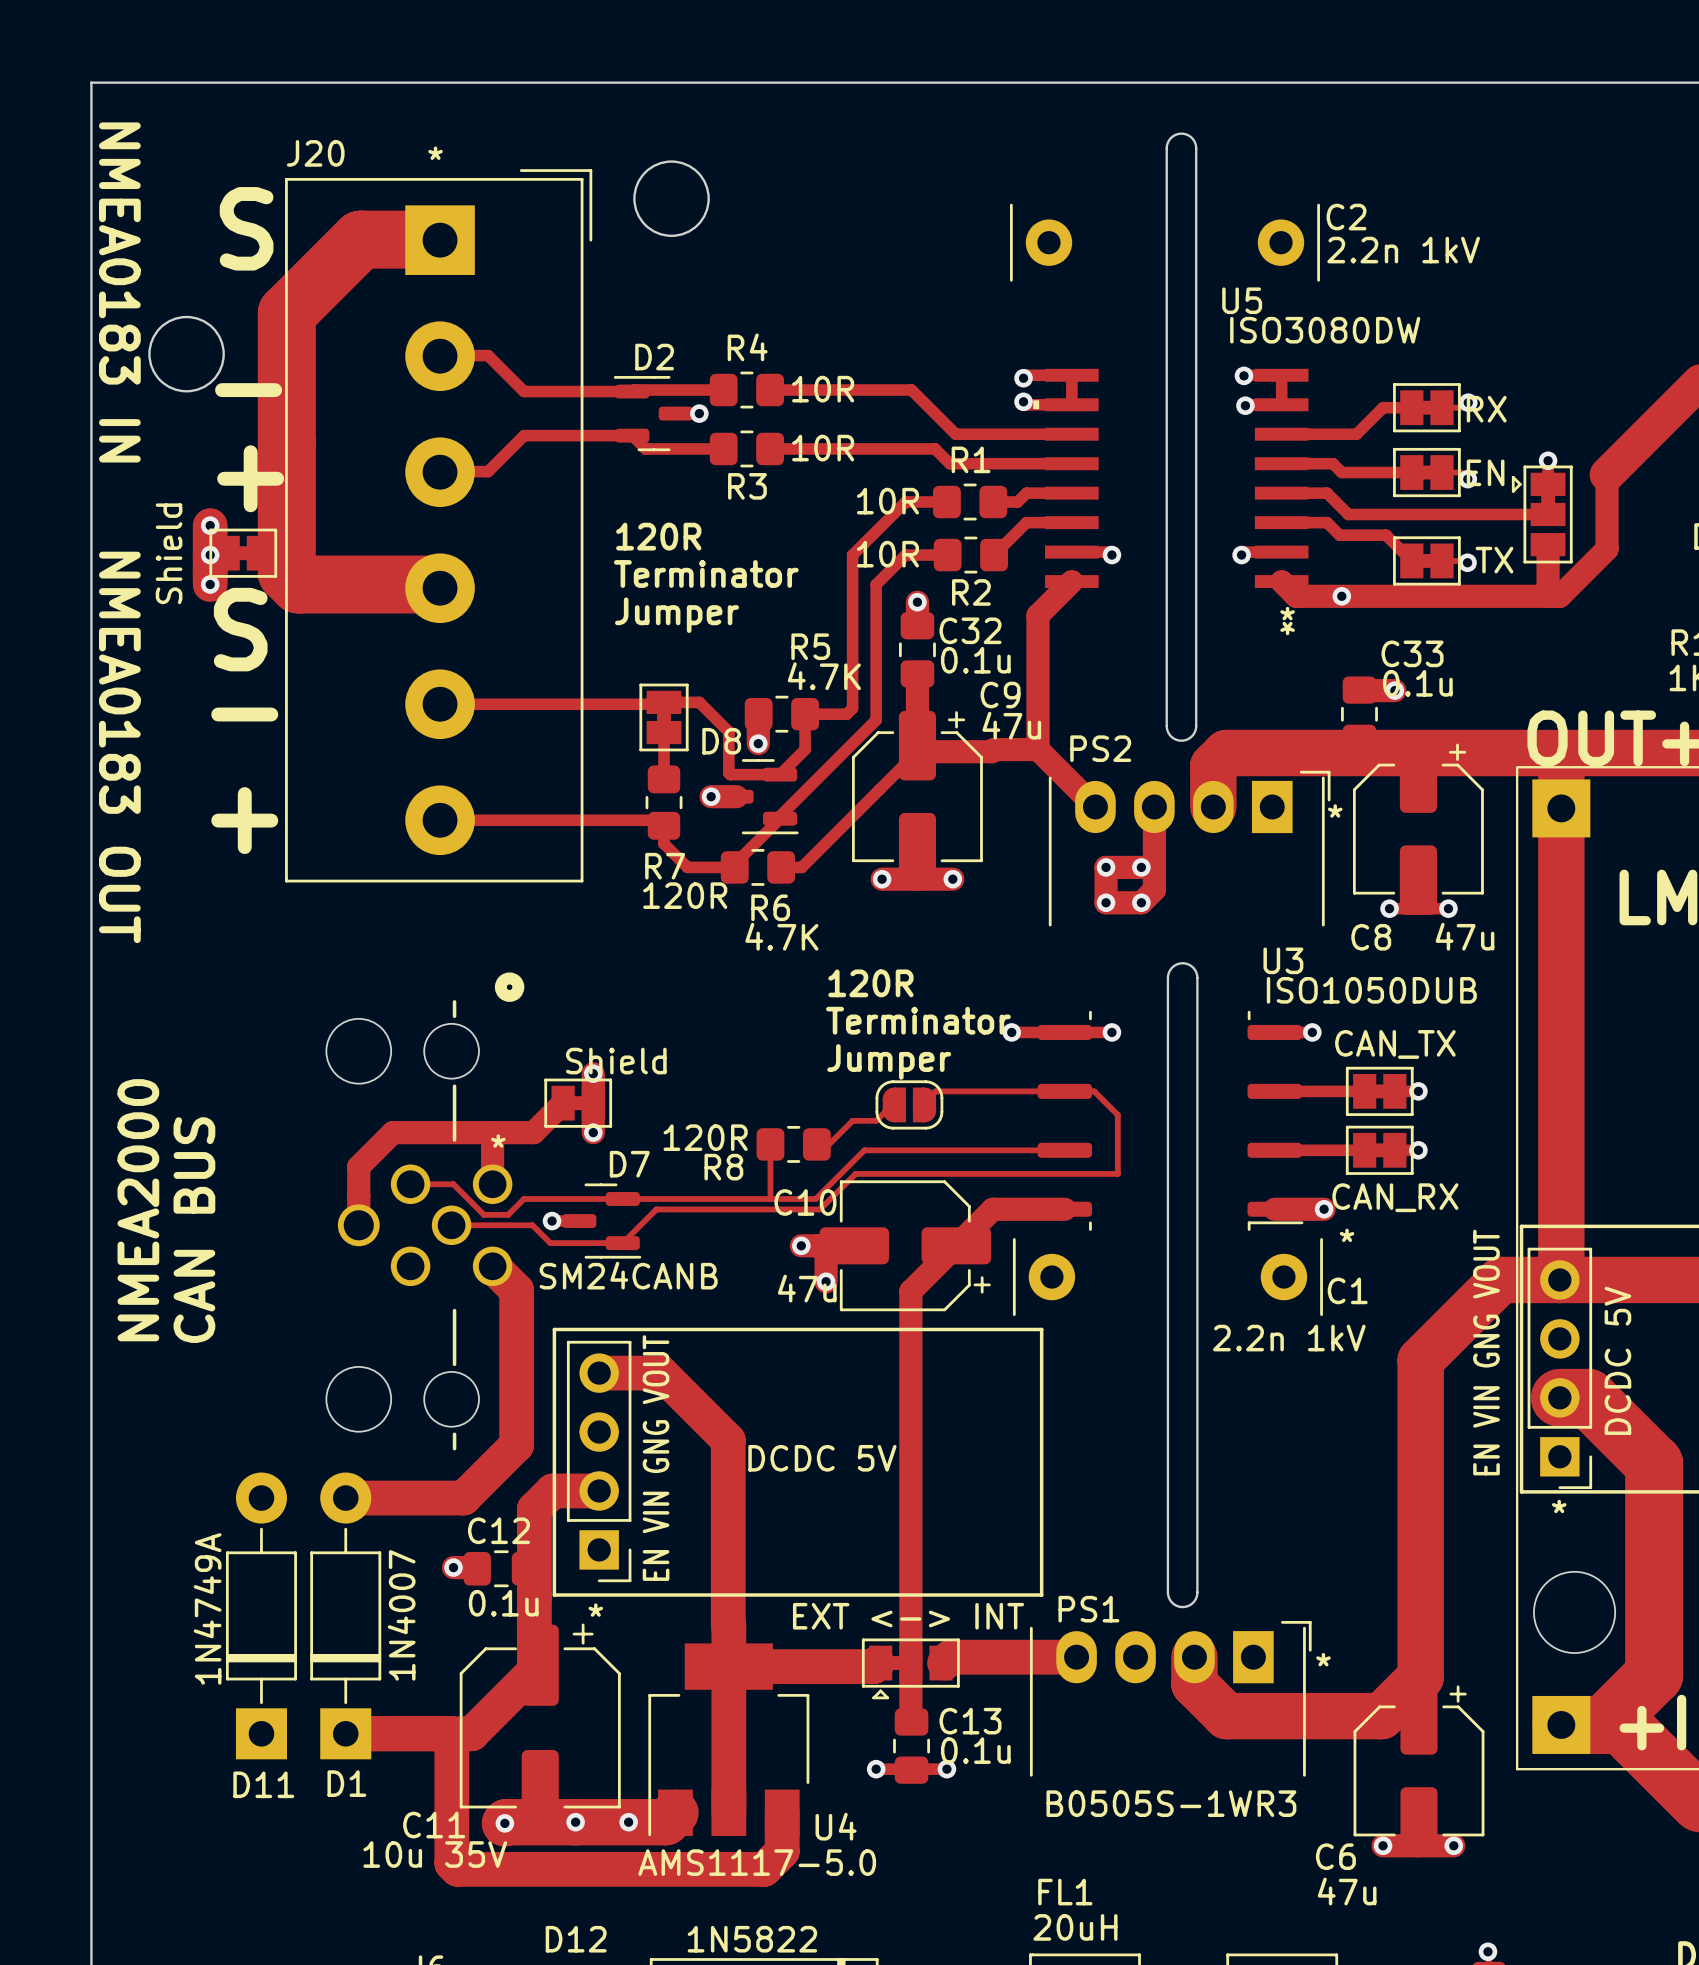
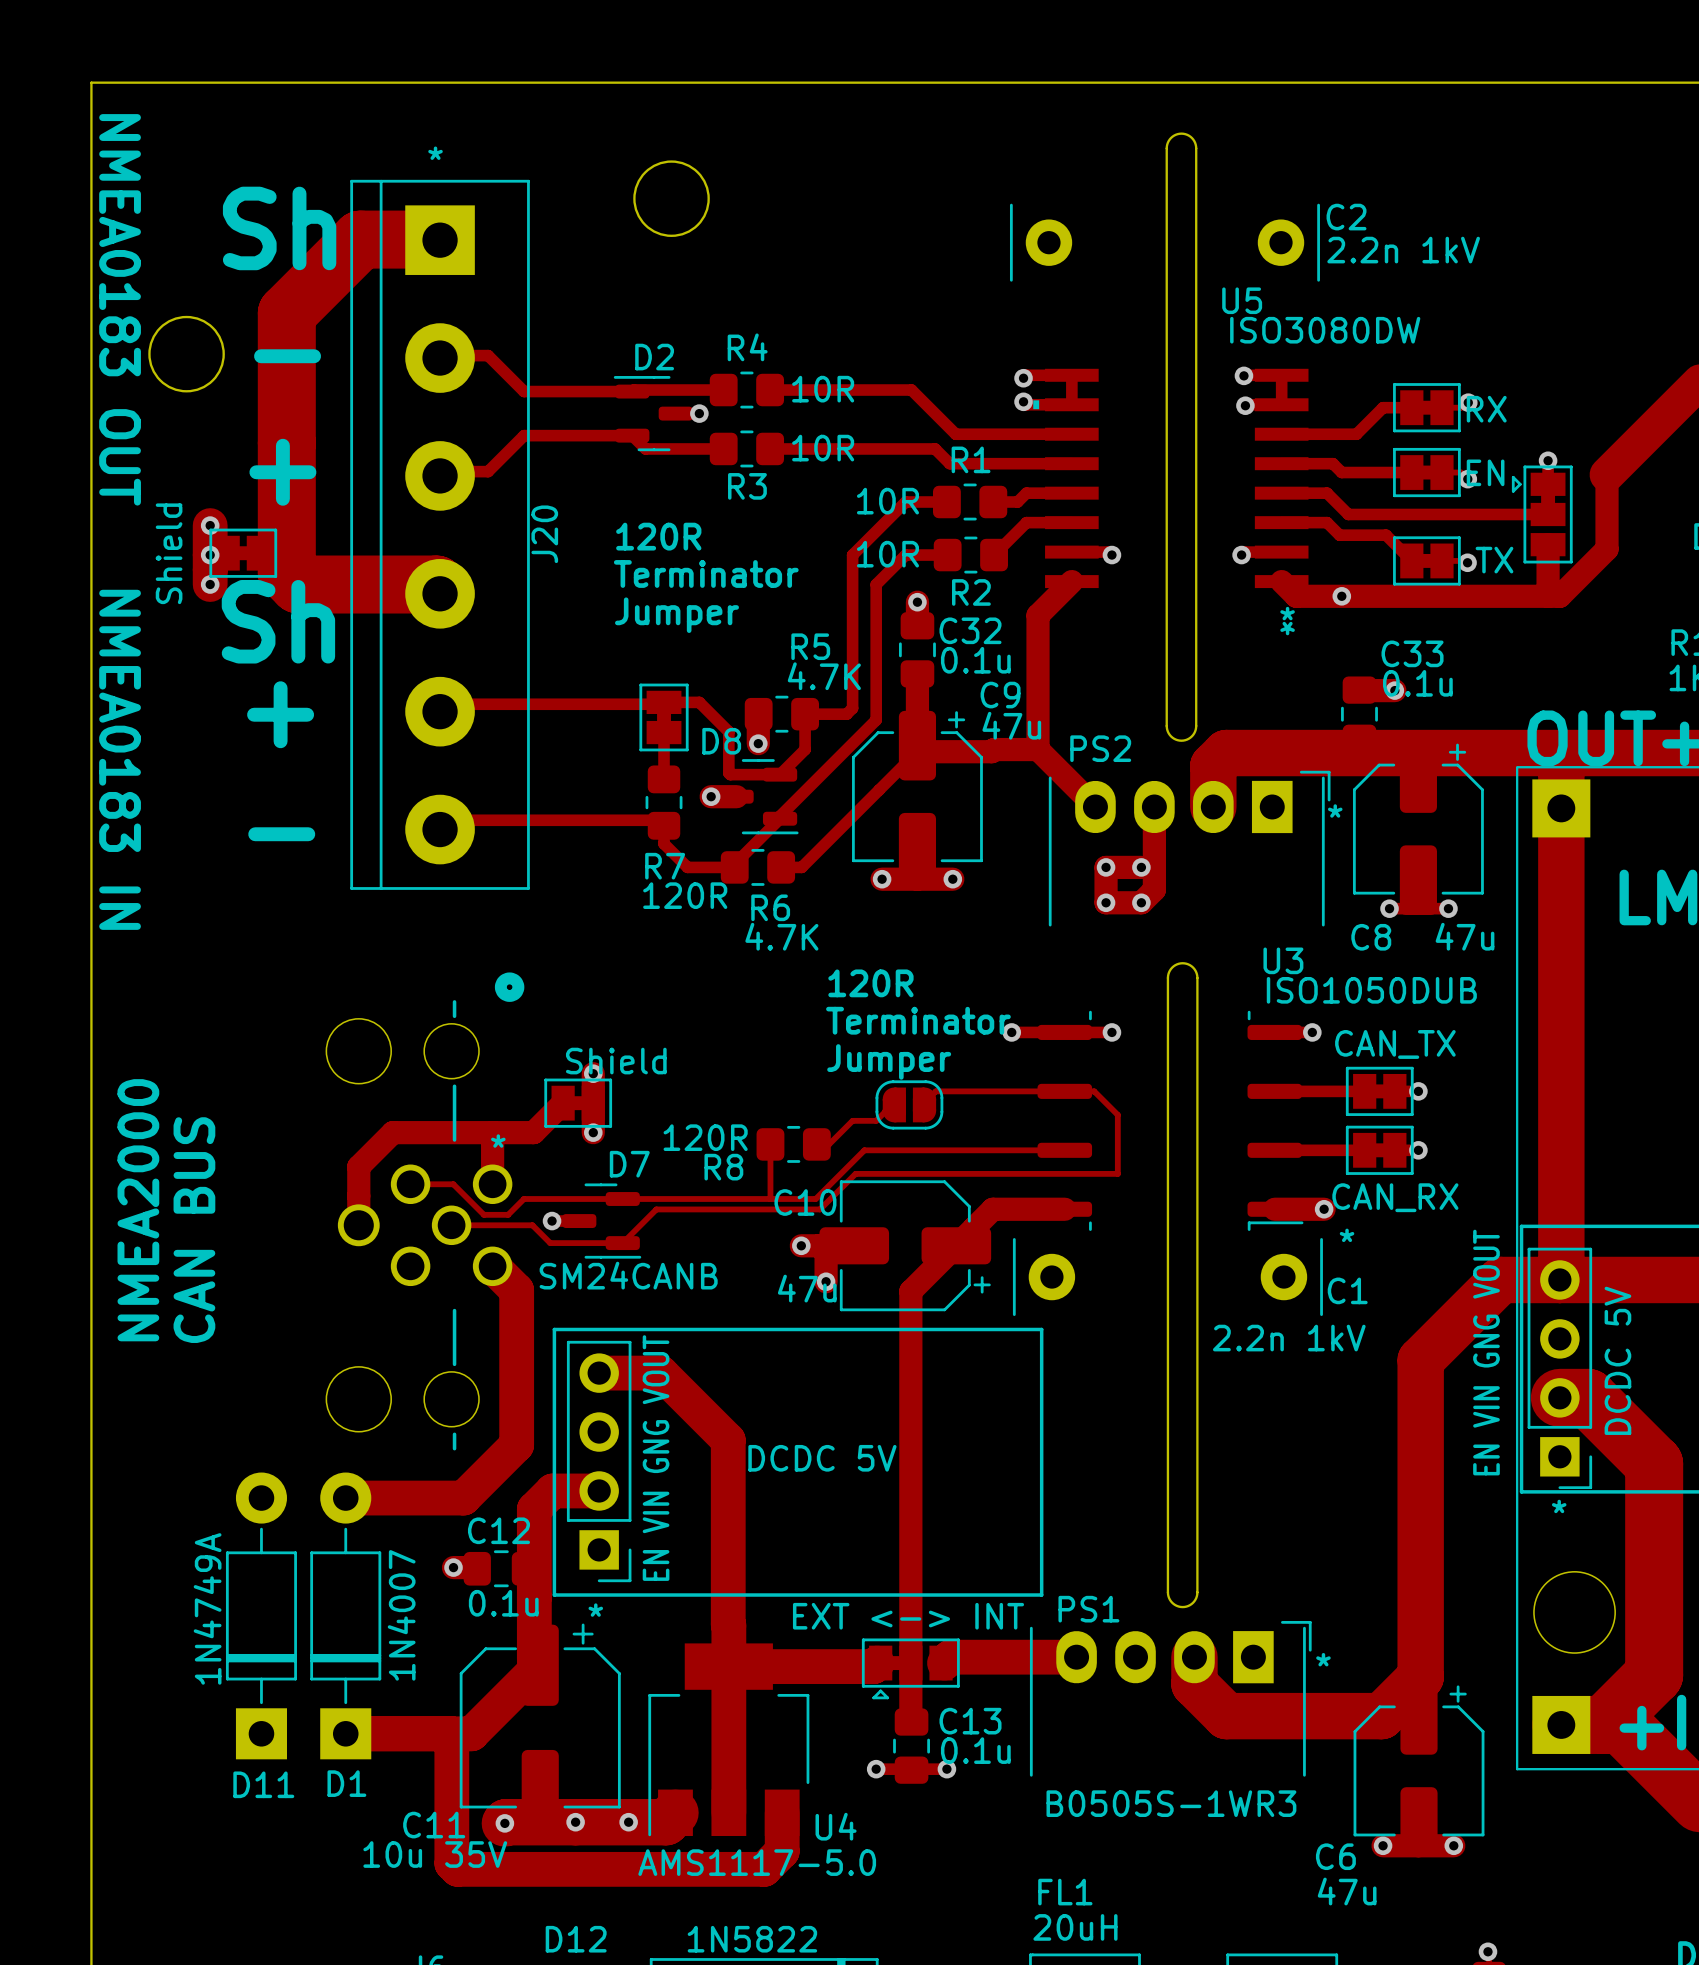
J20 name position: J20 (315, 153) -> J20 (544, 534)
J20 footprint: [285, 169, 593, 883] -> [350, 179, 530, 890]
text: S (246, 228) -> Sh (279, 228)
text position: - (248, 390) -> - (287, 356)
text position: + (250, 478) -> + (282, 472)
text: NMEA0183 IN NMEA0183 OUT (119, 532) -> NMEA0183 OUT NMEA0183 IN (120, 521)
text: S (240, 629) -> Sh (278, 621)
text position: - (244, 714) -> - (281, 834)
text position: + (244, 820) -> + (280, 714)

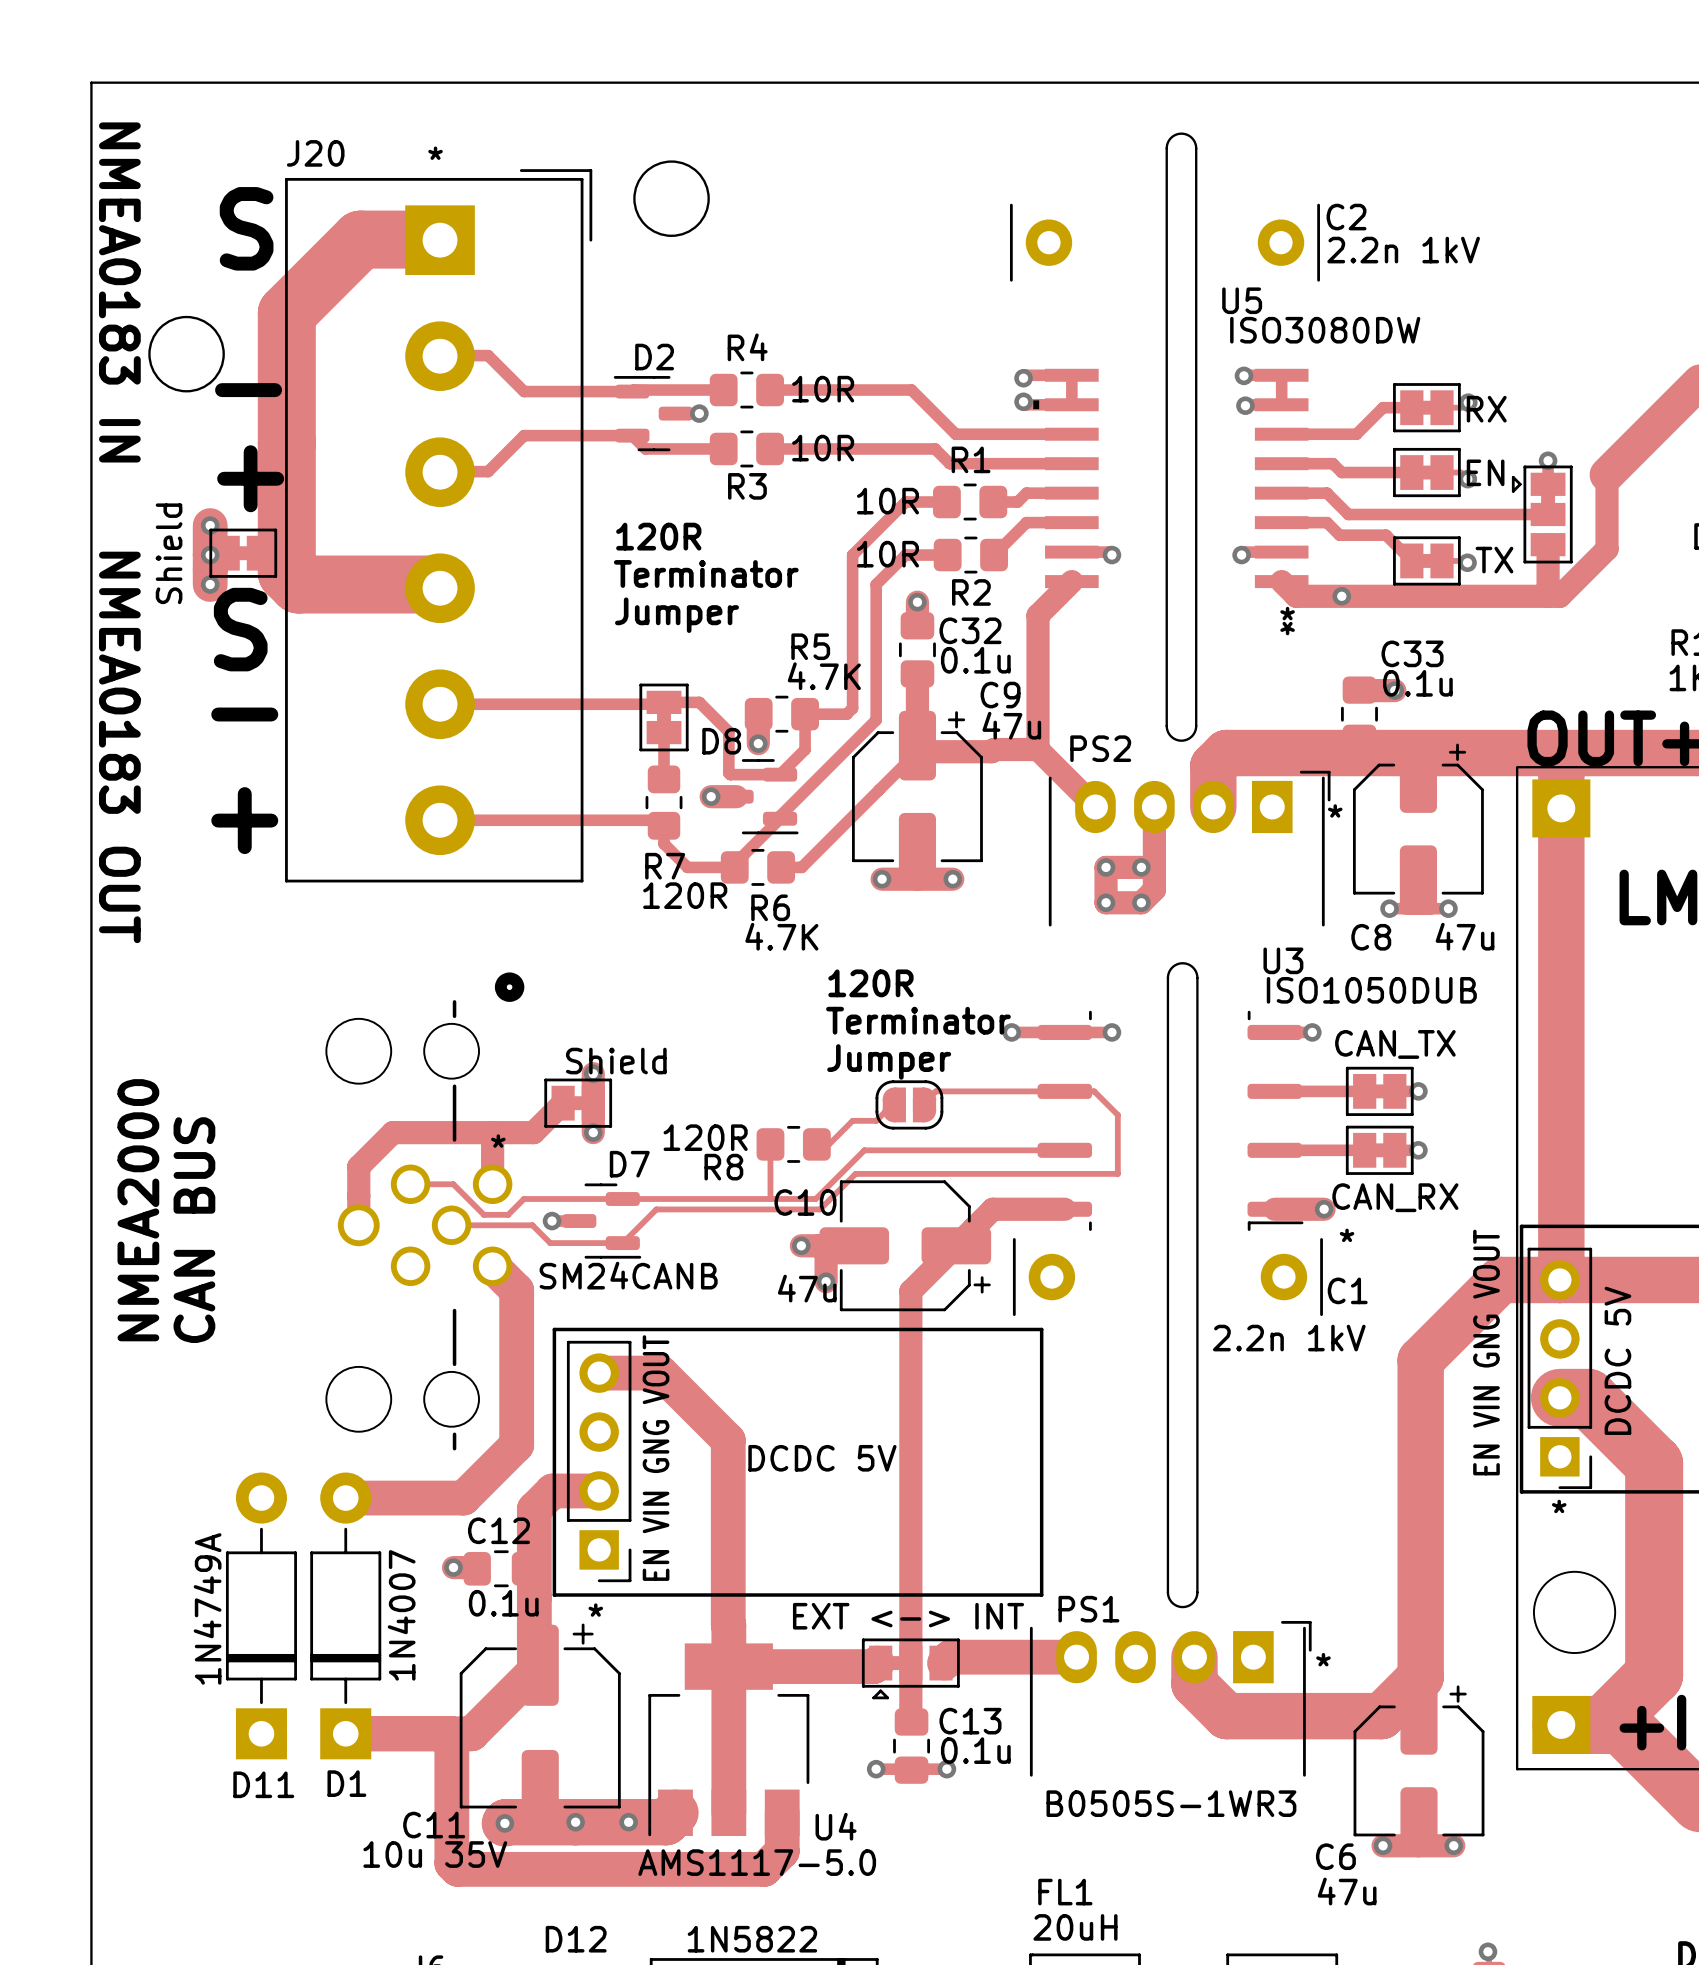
J20 footprint: [350, 179, 530, 890] -> [285, 169, 593, 883]
text: Sh (279, 228) -> S (246, 228)
text position: - (287, 356) -> - (248, 390)
text position: + (282, 472) -> + (250, 478)
text: NMEA0183 OUT NMEA0183 IN (120, 521) -> NMEA0183 IN NMEA0183 OUT (119, 532)
J20 name position: J20 (544, 534) -> J20 (315, 153)
text: Sh (278, 621) -> S (240, 629)
text position: + (280, 714) -> + (244, 820)
text position: - (281, 834) -> - (244, 714)

